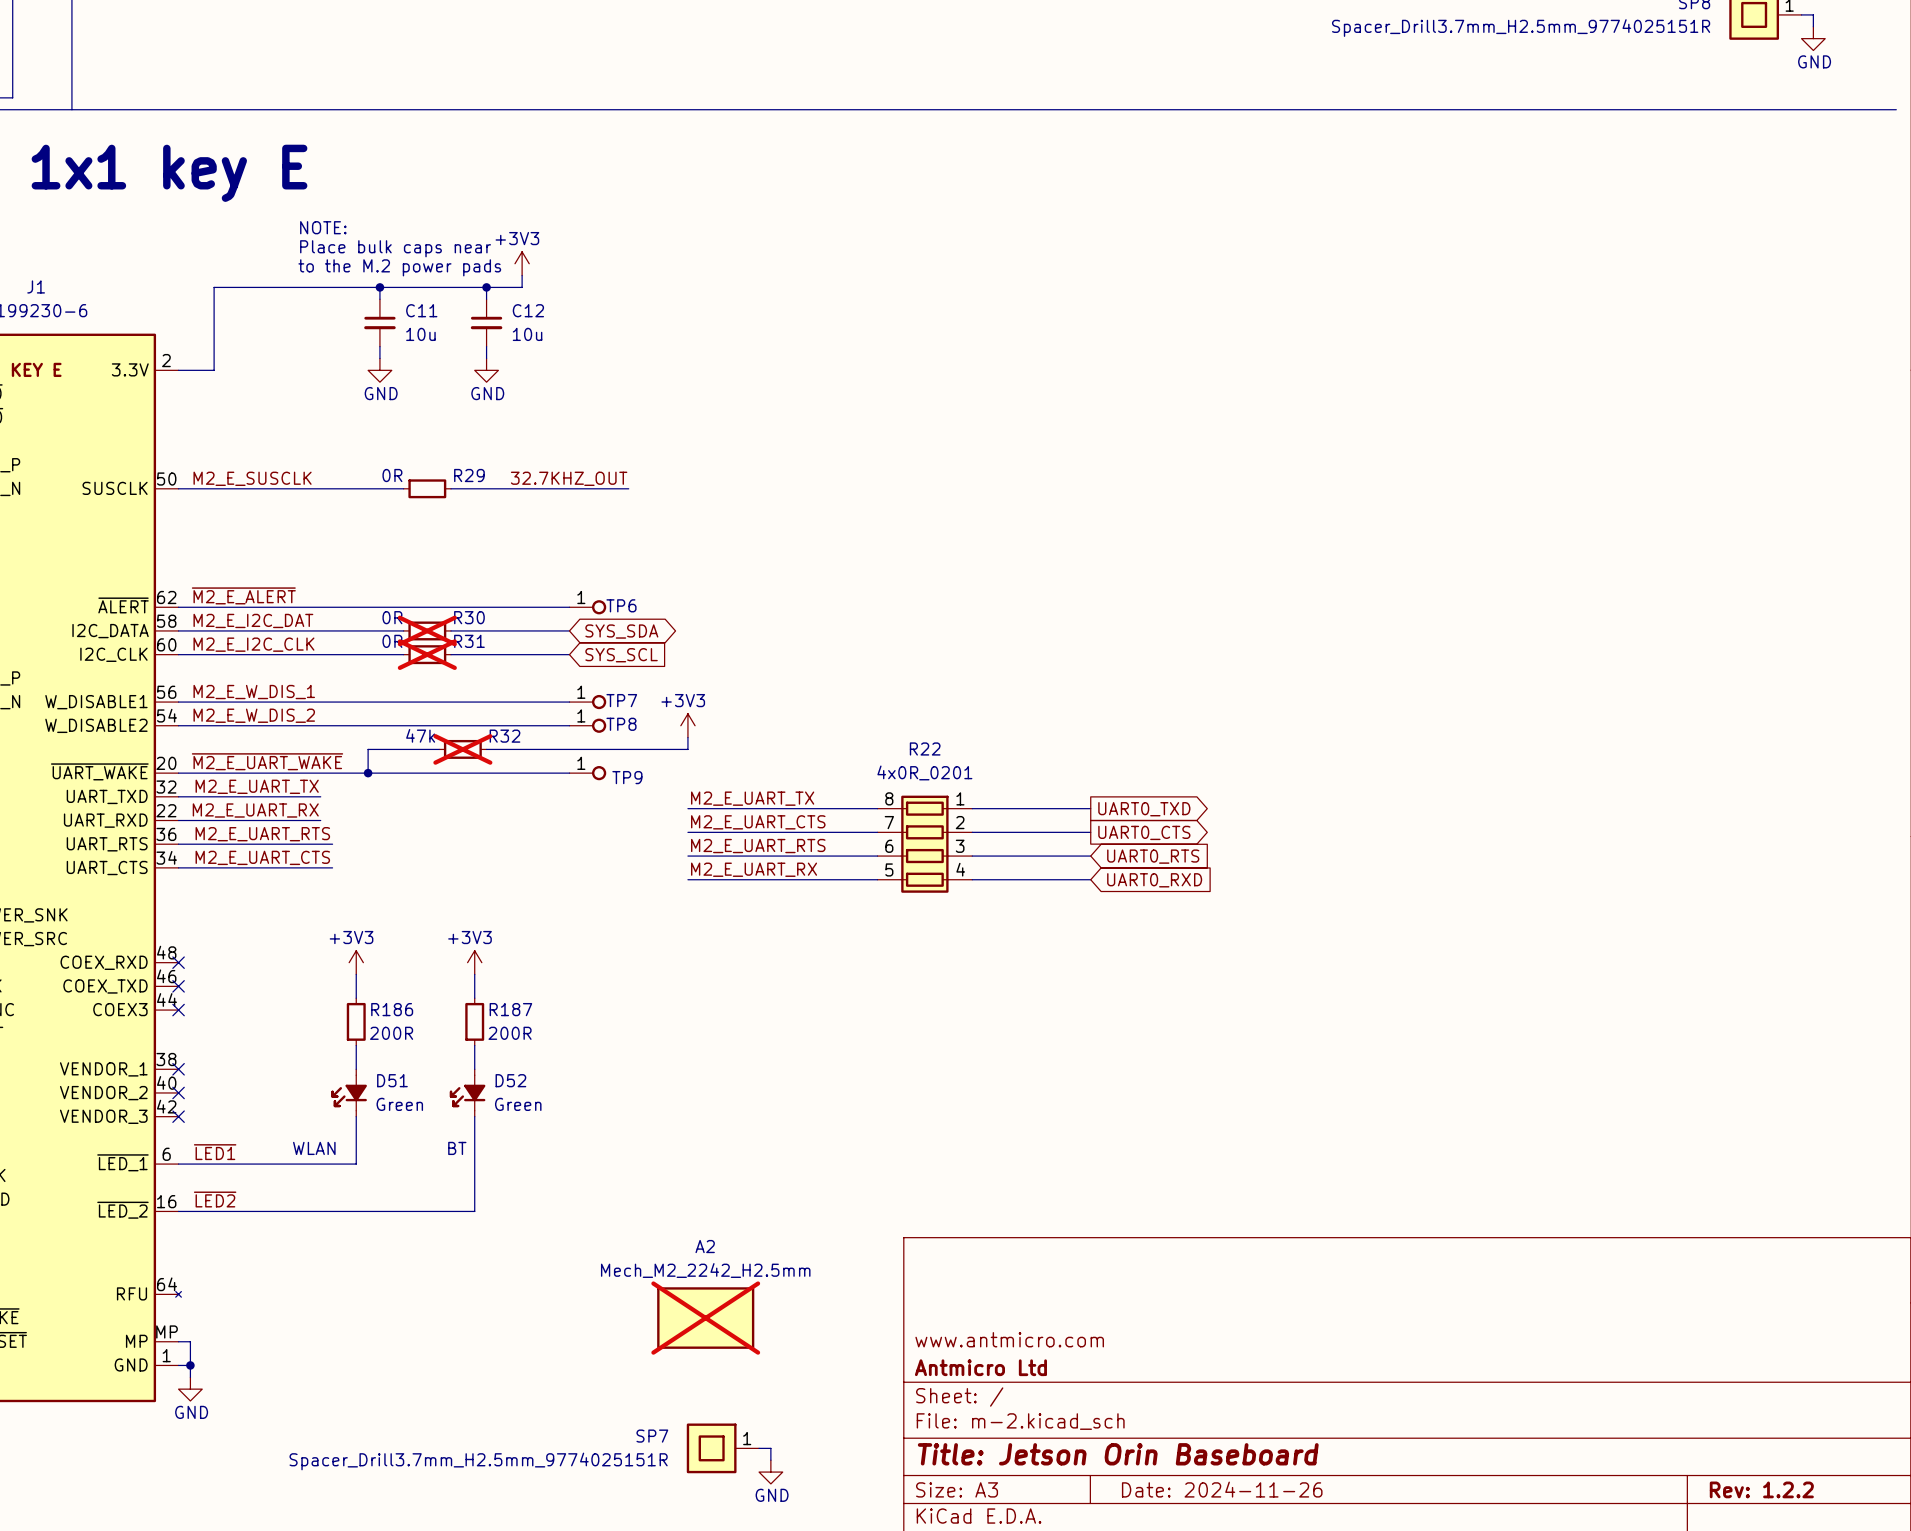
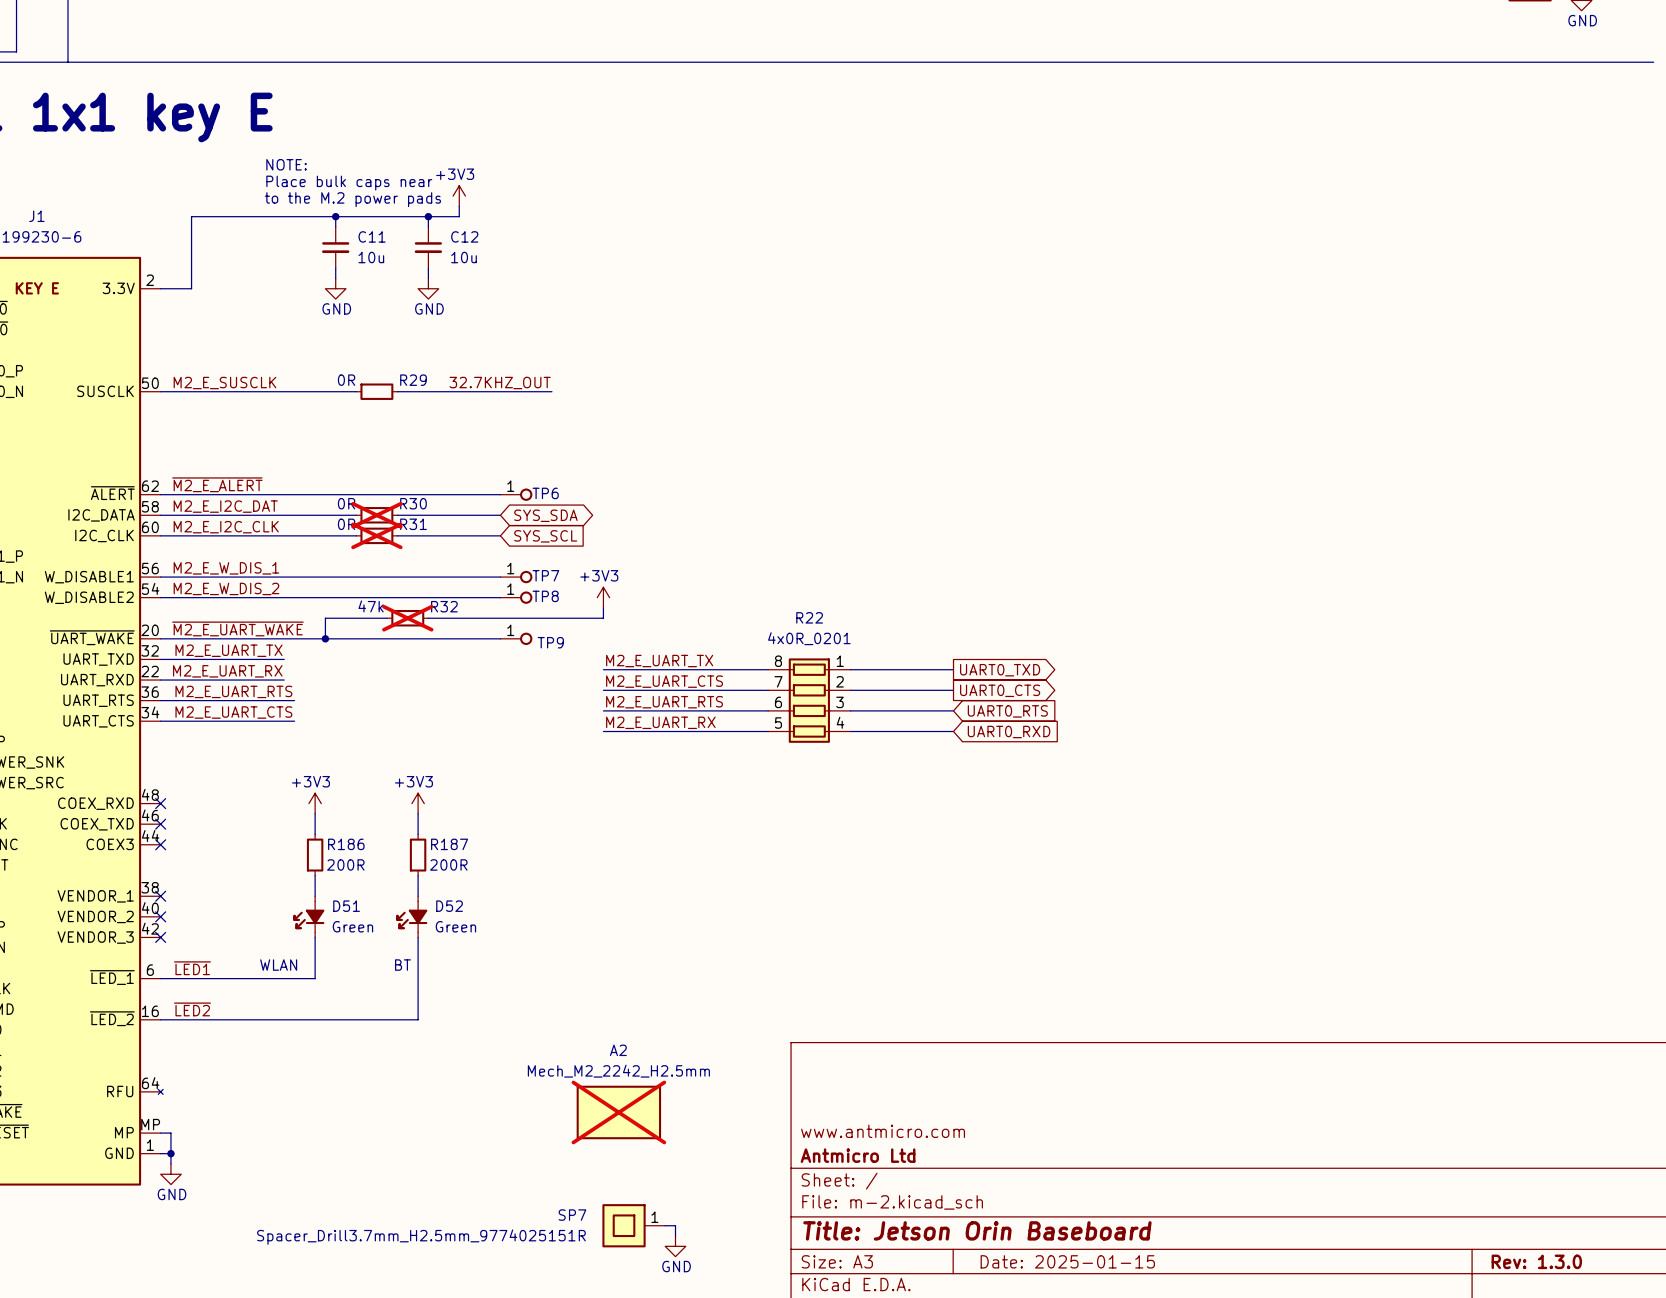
title block: Date: 2024-11-26 (1222, 1489) -> Date: 2025-01-15 (1067, 1261)
title block: Rev: 1.2.2 (1761, 1489) -> Rev: 1.3.0 (1536, 1261)

